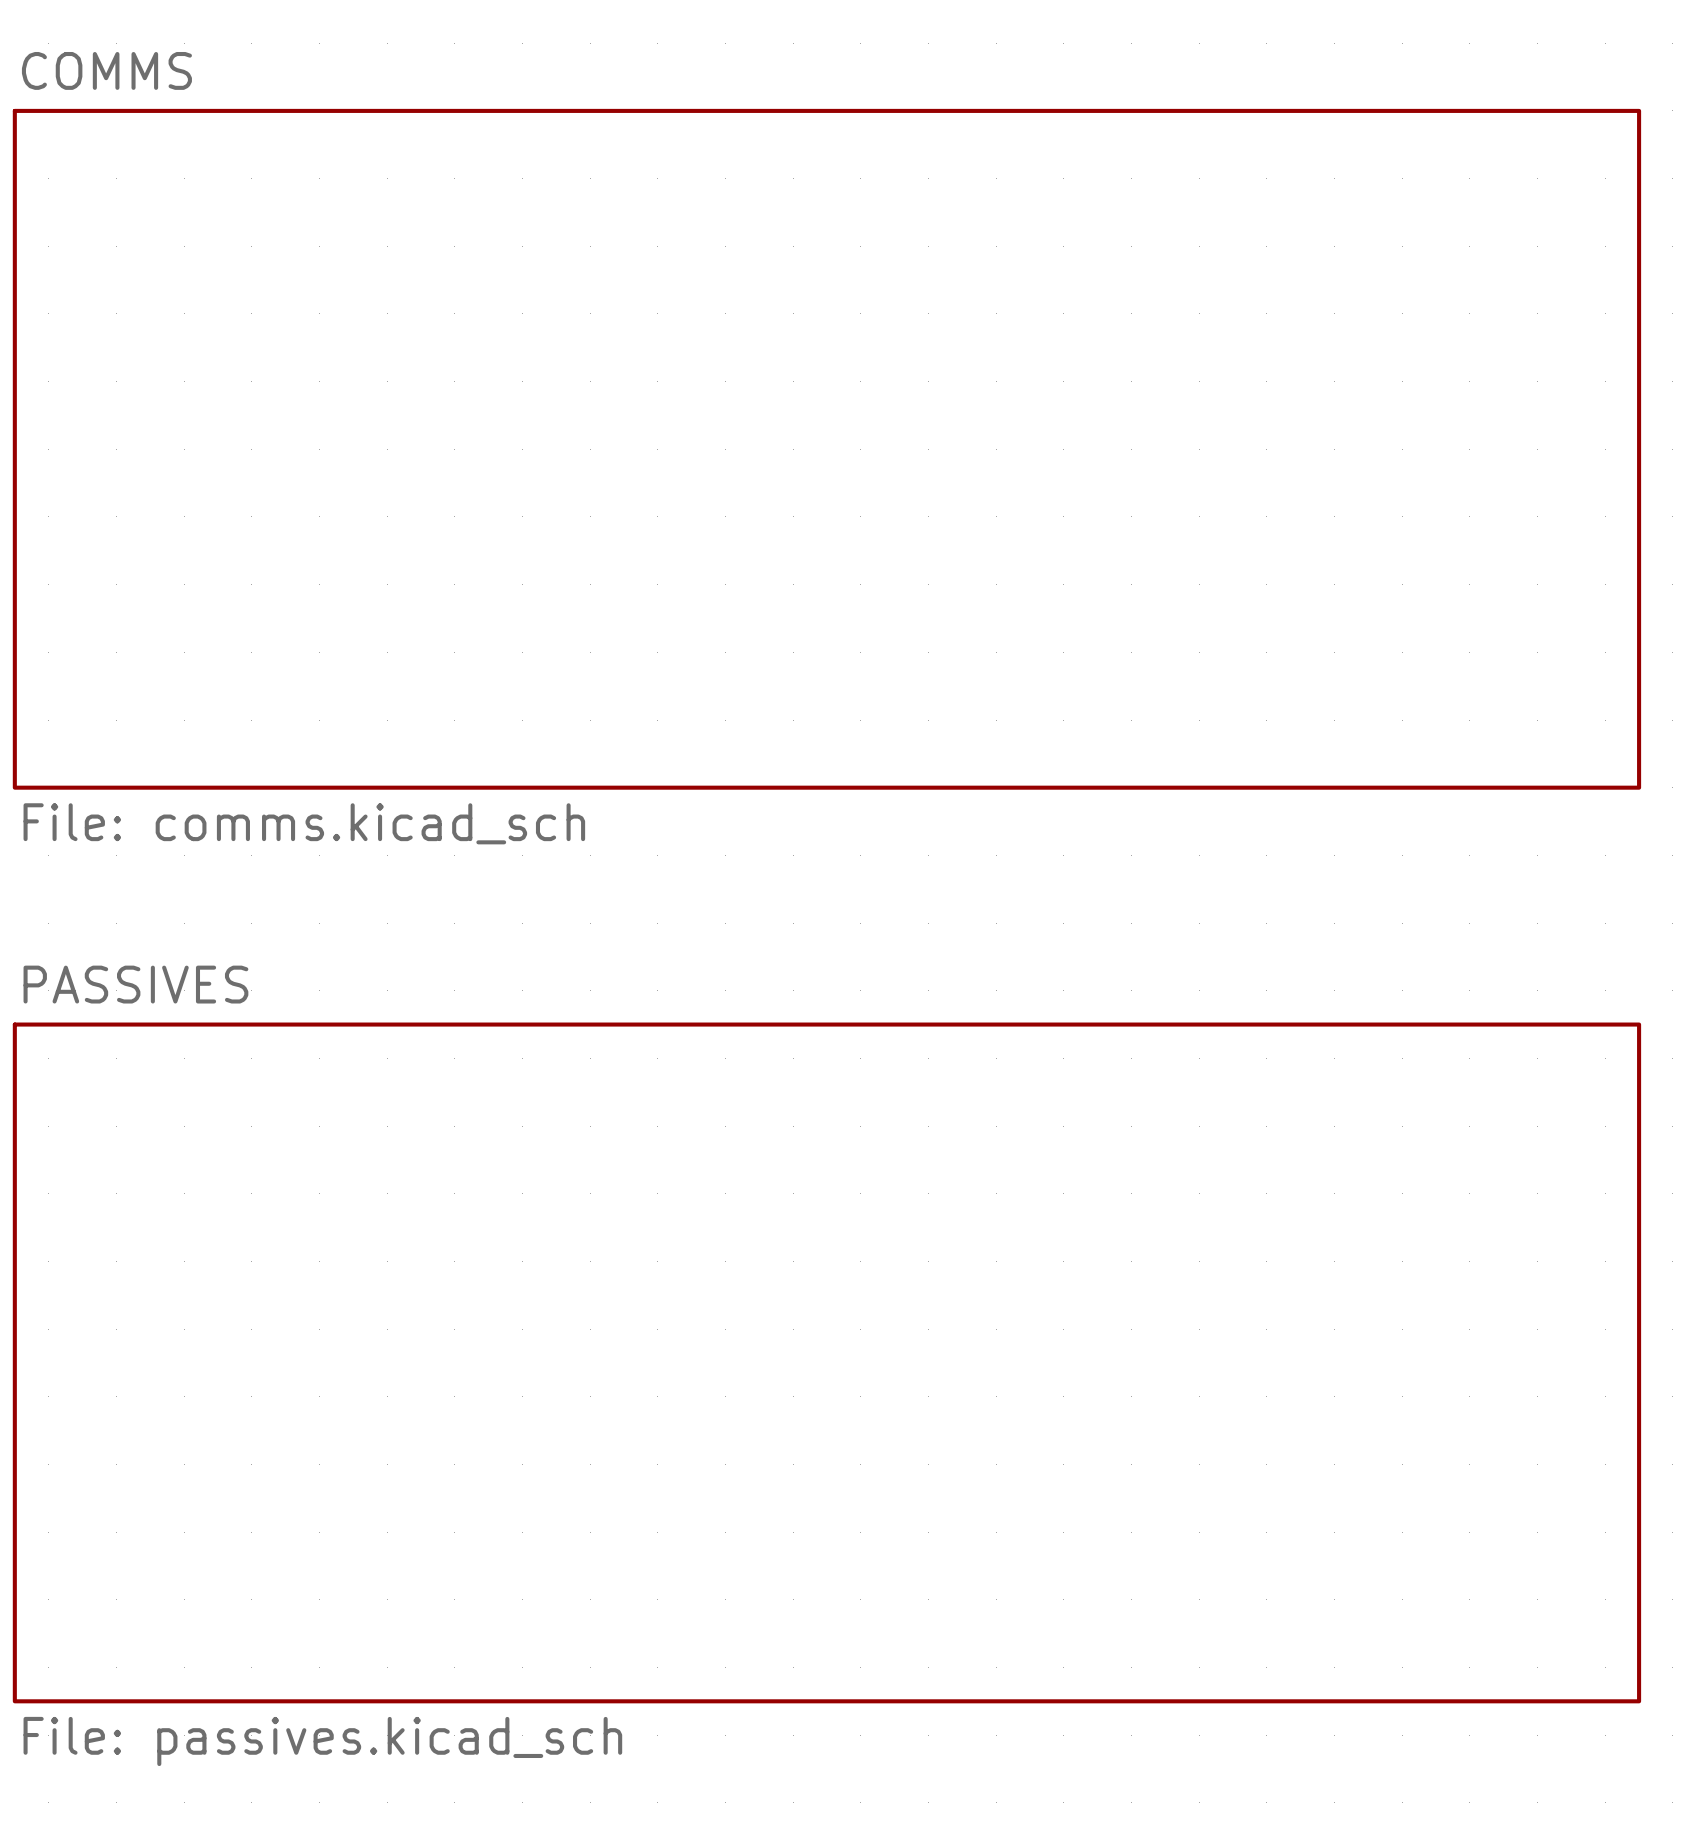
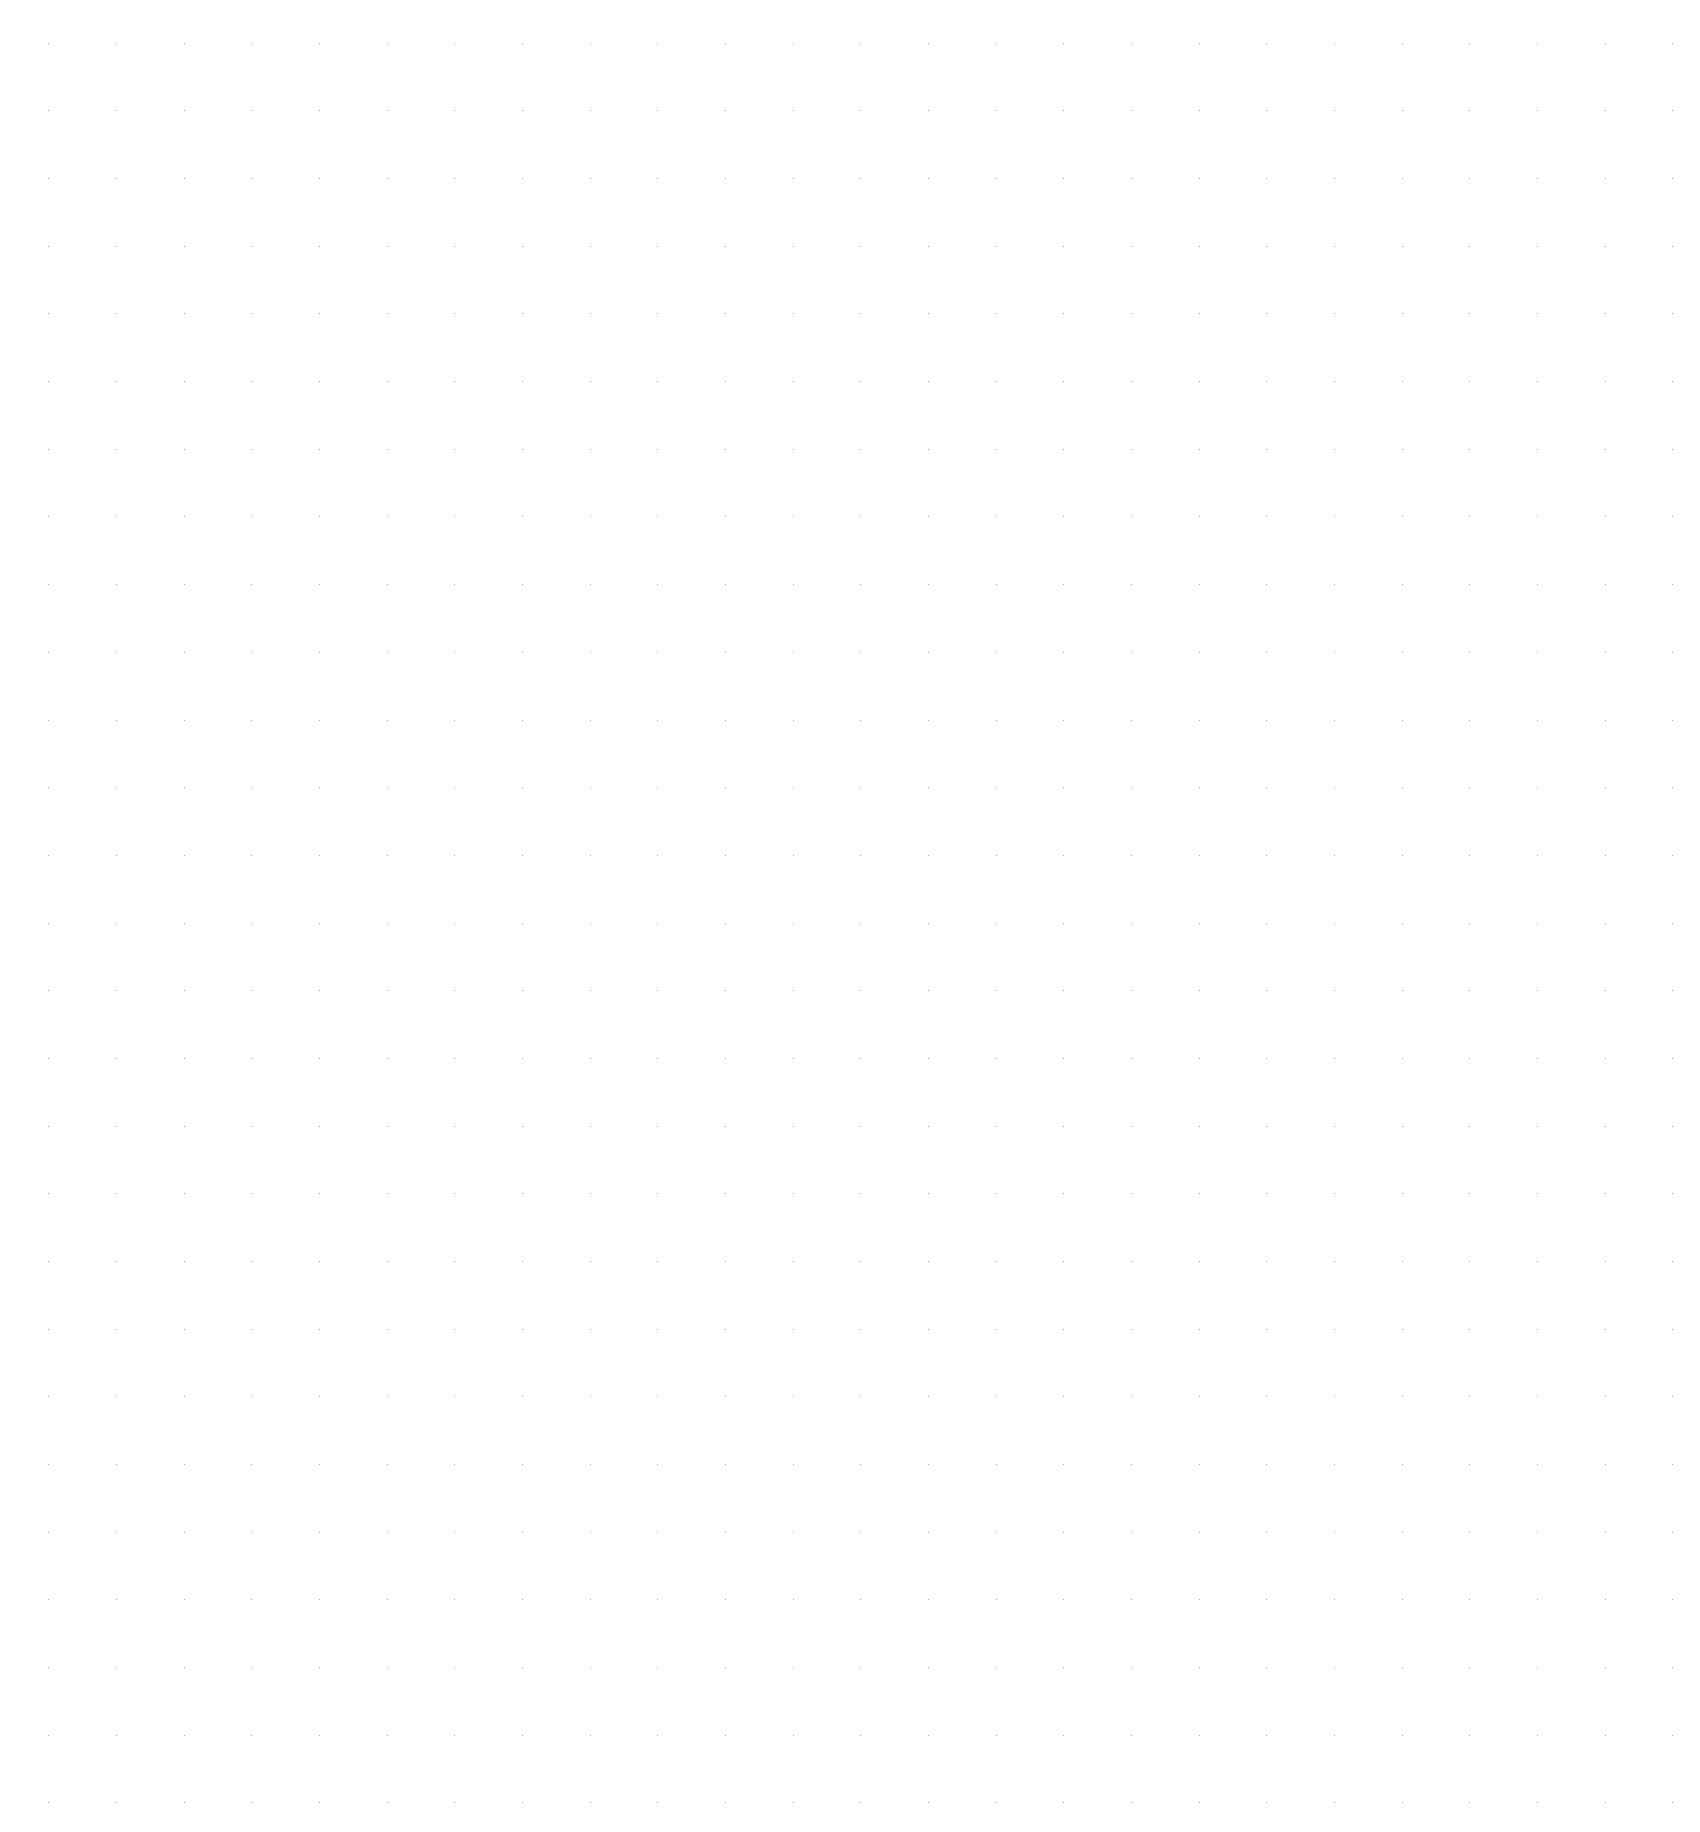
sheet COMMS: File: comms.kicad_sch (826, 449) -> none
sheet PASSIVES: File: passives.kicad_sch (826, 1362) -> none

